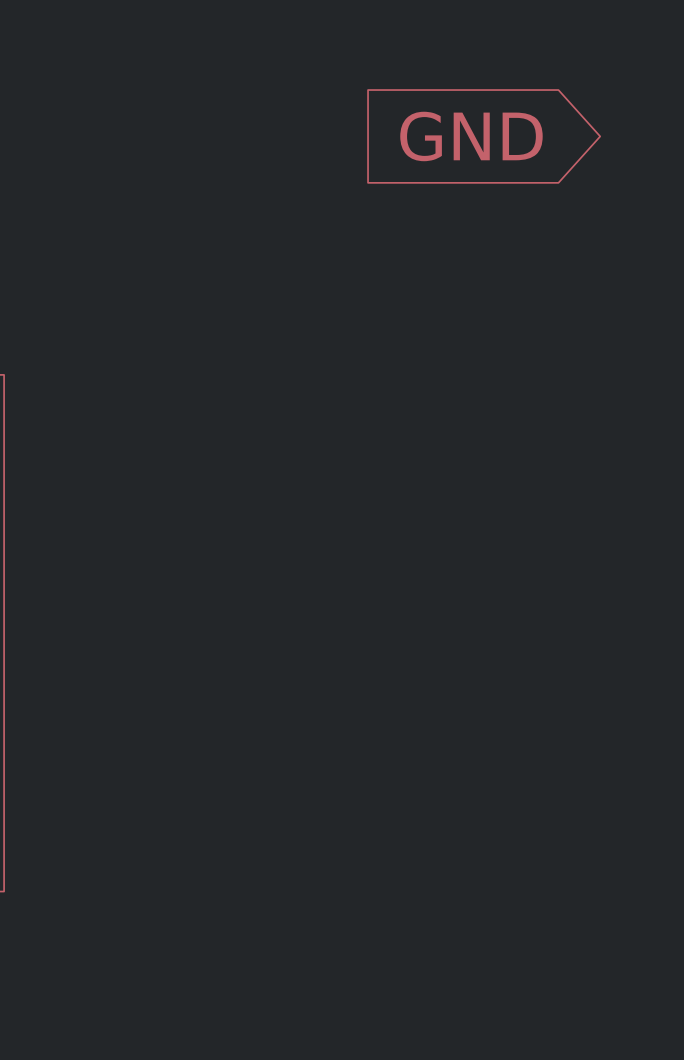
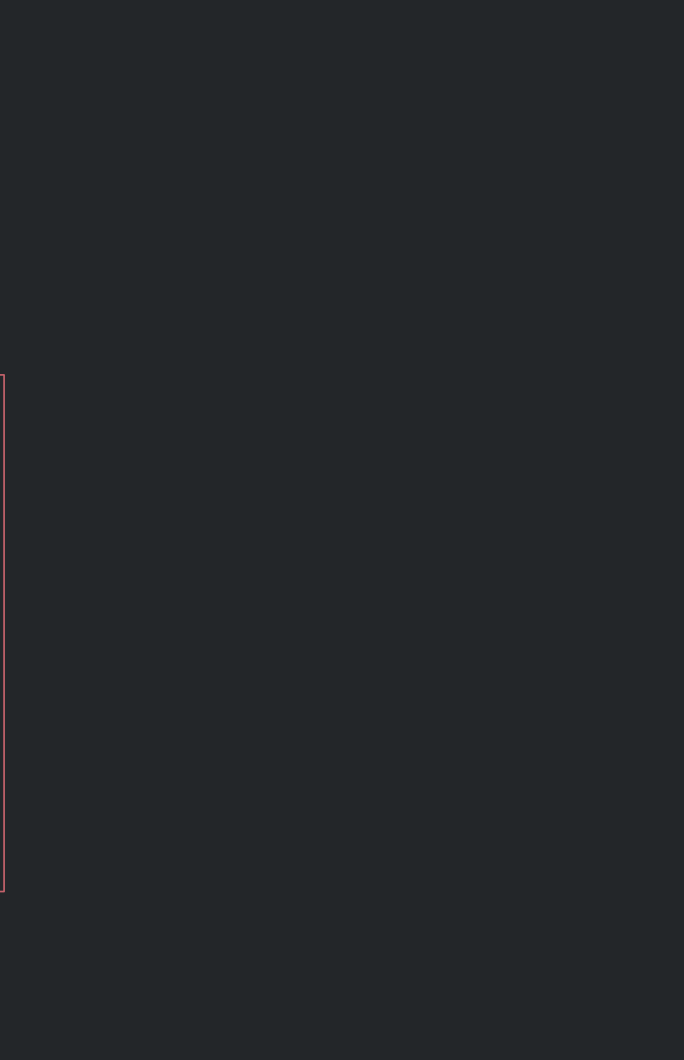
global label: GND (471, 136) -> none

